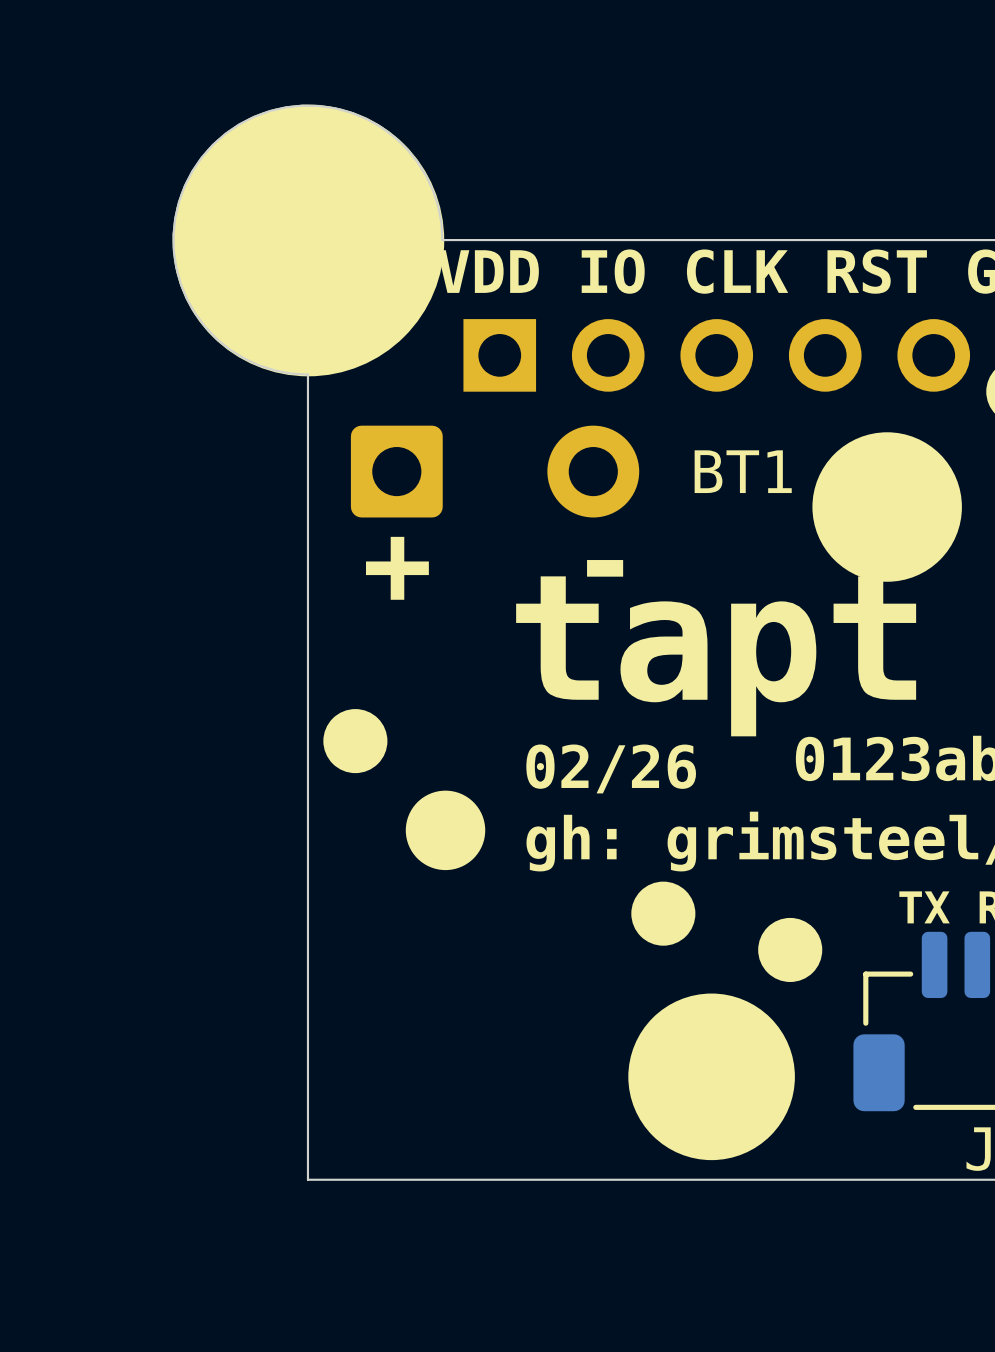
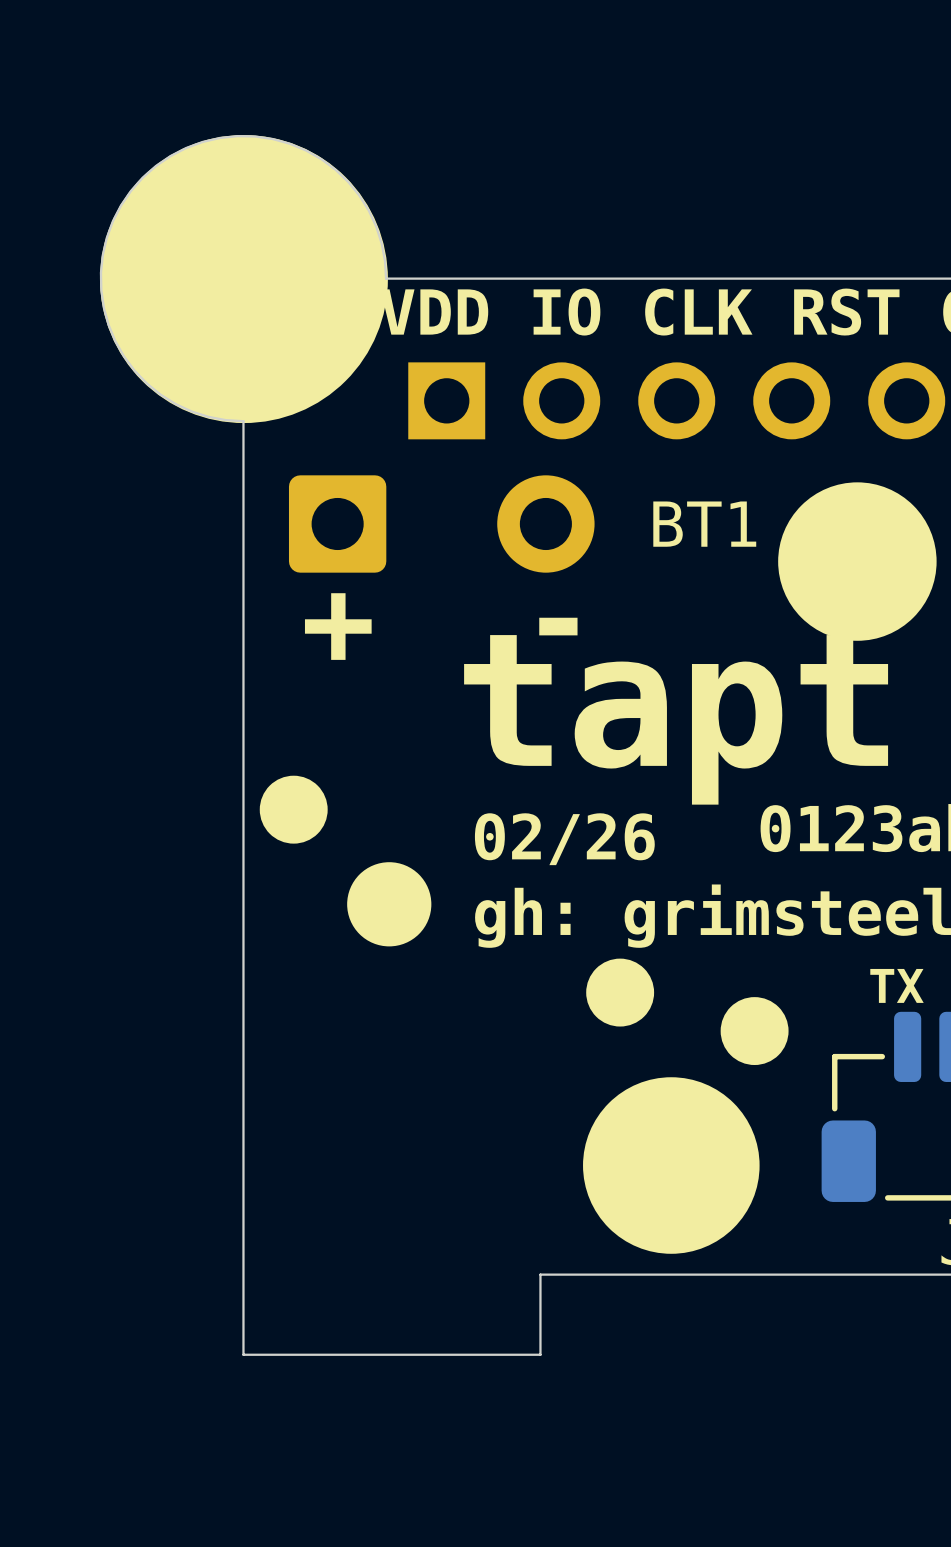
board edge: (588, 1179) (307, 1179) -> (540, 1274) (540, 1354) (243, 1354) (243, 1274)

